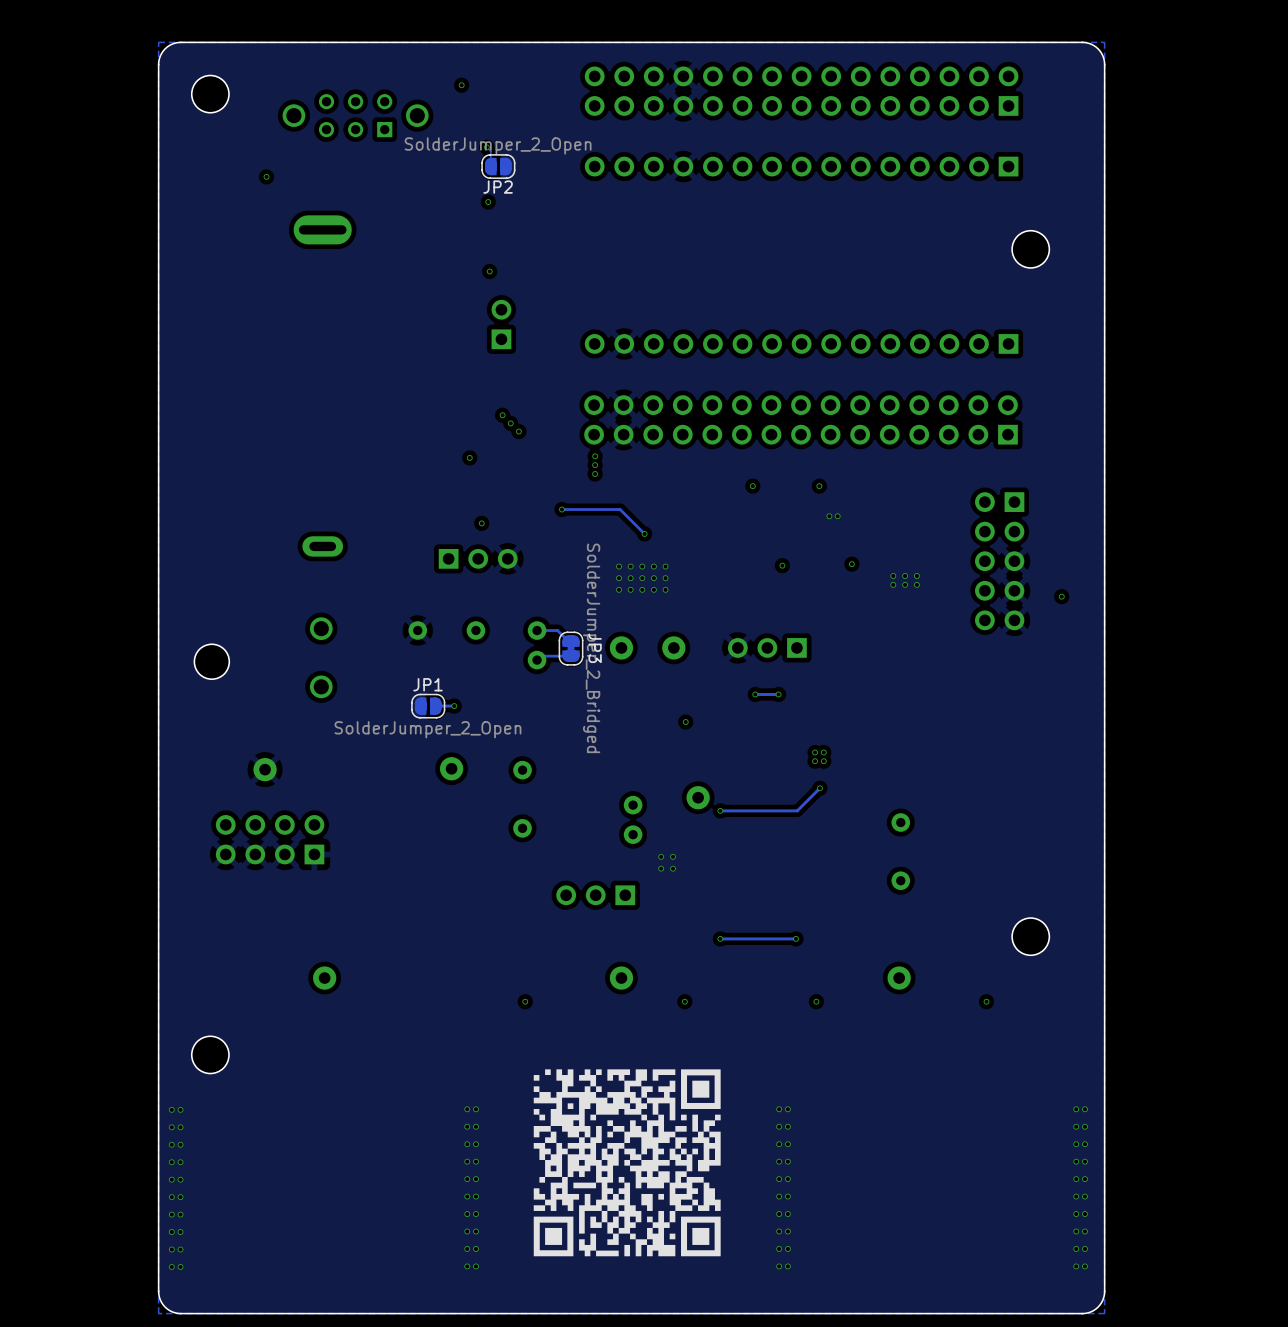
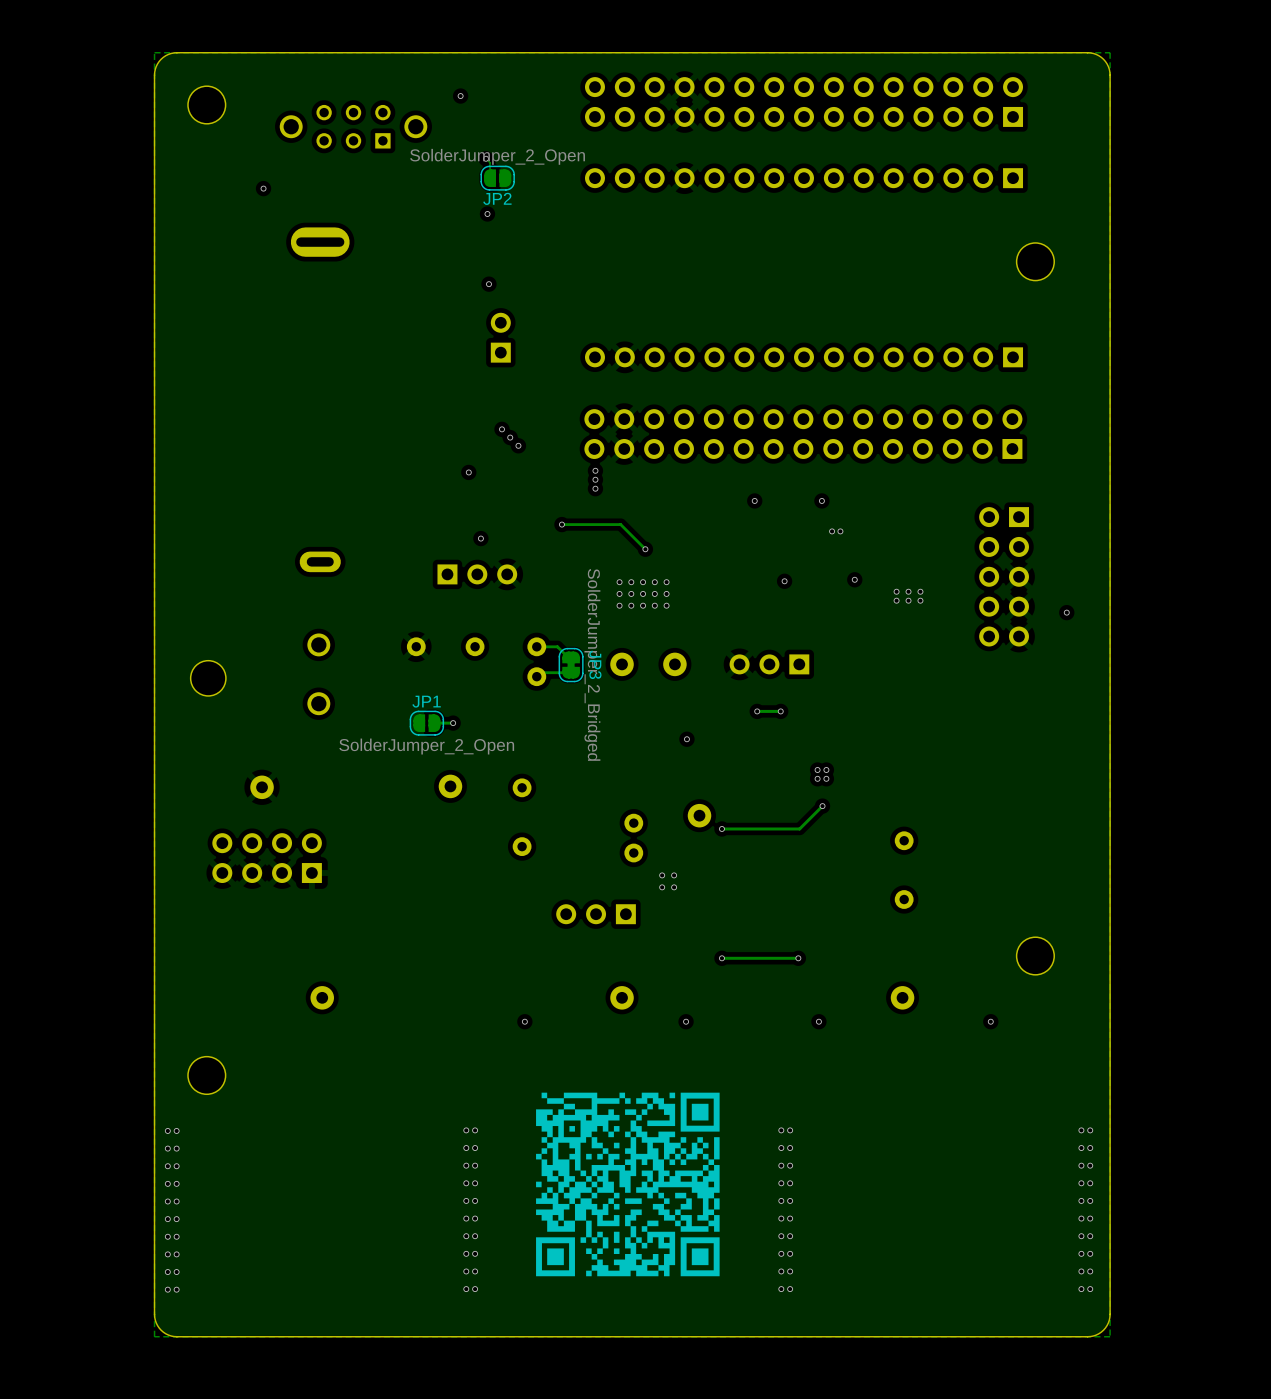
drawing shape: [533, 1069, 721, 1257] -> [536, 1092, 720, 1277]

